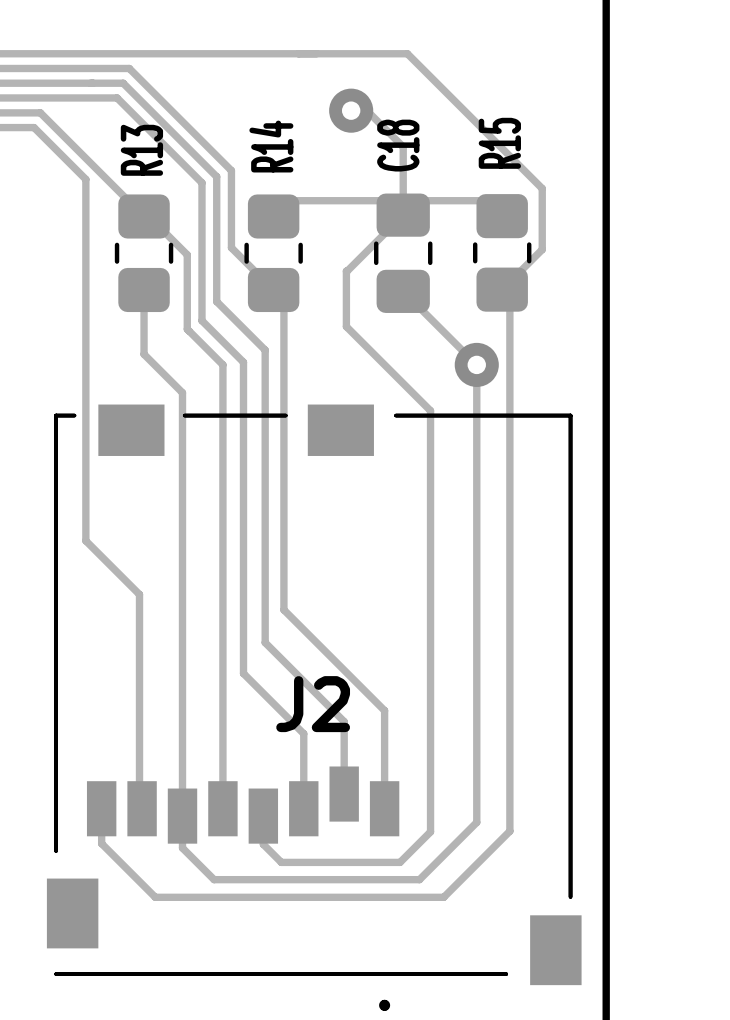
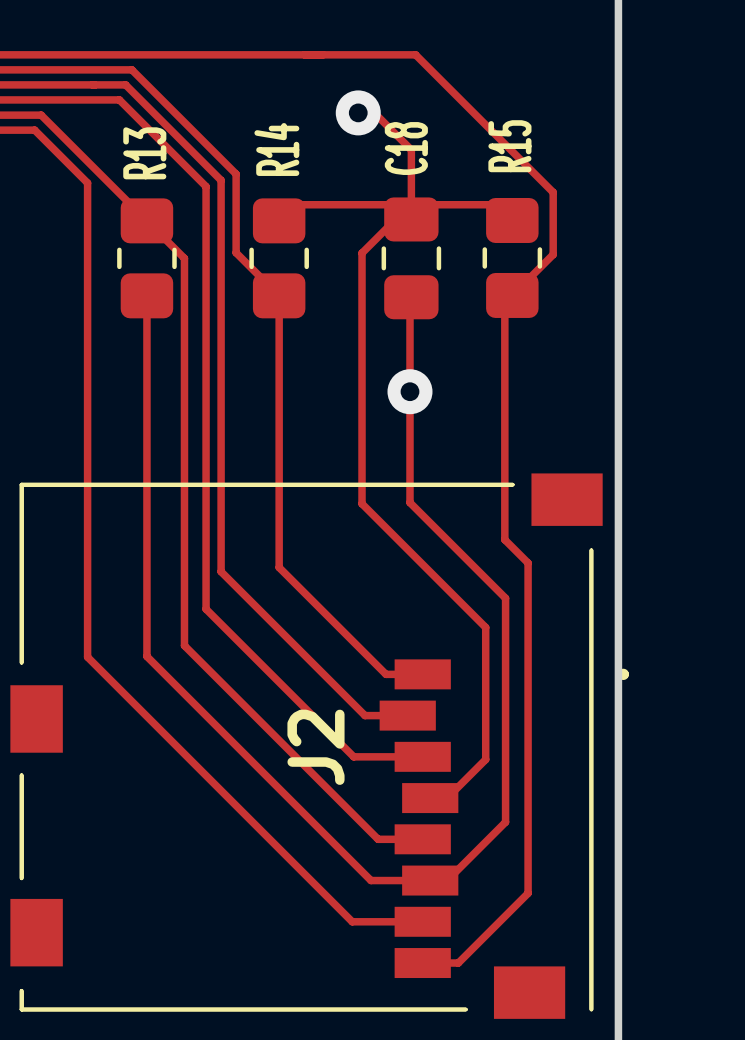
track: (403, 215) (346, 271) (346, 326) (430, 410) (430, 831) (400, 862) (281, 862) (263, 844) (263, 816) -> (411, 219) (395, 219) (362, 253) (362, 503) (485, 627) (485, 759) (447, 798) (430, 798)
track: (144, 216) (148, 216) (187, 254) (187, 329) (222, 364) (222, 808) -> (146, 220) (184, 258) (184, 645) (378, 839) (422, 839)
track: (273, 289) (283, 300) (283, 609) (384, 710) (384, 808) -> none
track: (502, 289) (509, 297) (509, 831) (443, 897) (155, 897) (101, 843) (101, 808) -> (512, 295) (504, 302) (504, 539) (528, 563) (528, 893) (458, 963) (422, 963)
track: (403, 291) (476, 364) (476, 822) (419, 879) (214, 879) (182, 848) (182, 392) (144, 354) -> (411, 297) (409, 502) (505, 598) (505, 822) (447, 880) (371, 880) (146, 656) (146, 361)
track: (216, 301) (265, 350) (265, 642) (344, 721) (344, 794) -> (221, 307) (221, 571) (365, 715) (407, 715)
track: none -> (279, 309) (279, 567) (386, 674) (422, 674)
track: (201, 320) (243, 362) (243, 673) (303, 733) (303, 808) -> (206, 327) (206, 609) (353, 756) (422, 756)
via position: (476, 364) -> (409, 391)
track: (85, 540) (139, 594) (139, 802) -> (87, 551) (87, 657) (352, 921) (422, 921)
J2 rotation: 0° (314, 707) -> 90° counterclockwise (319, 746)

